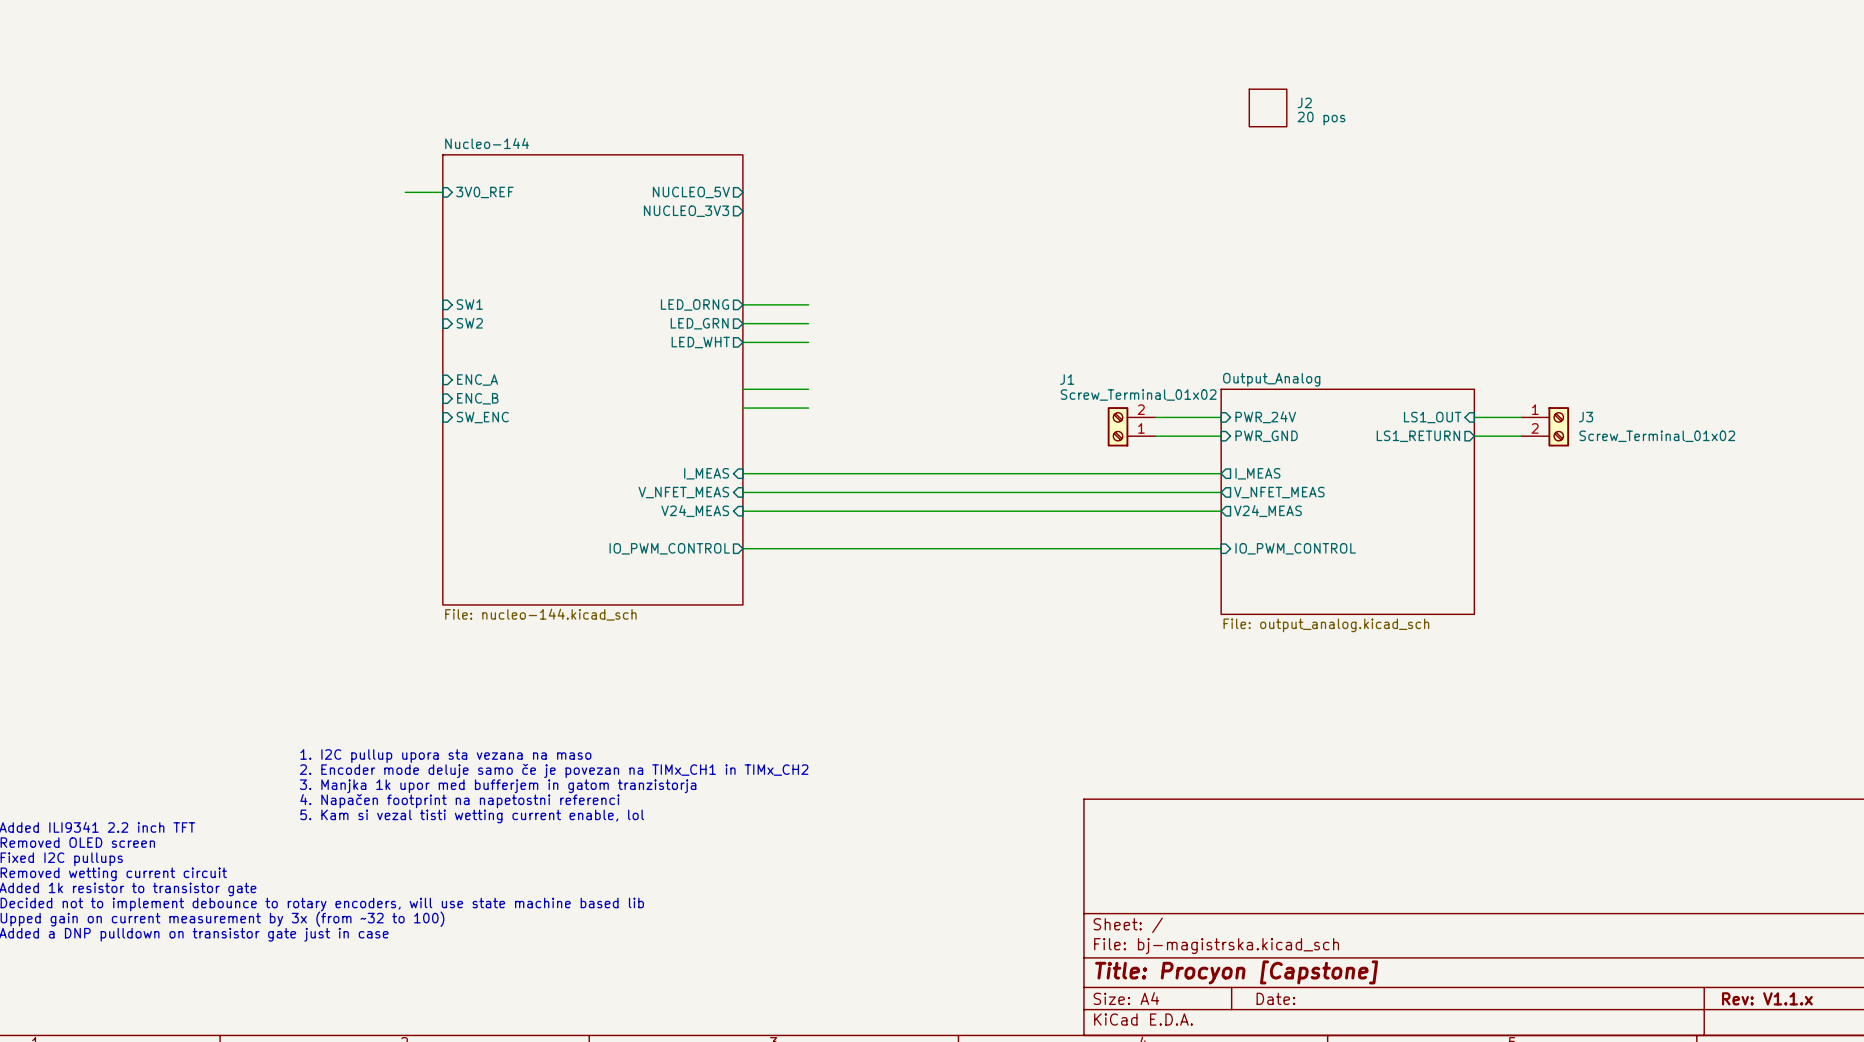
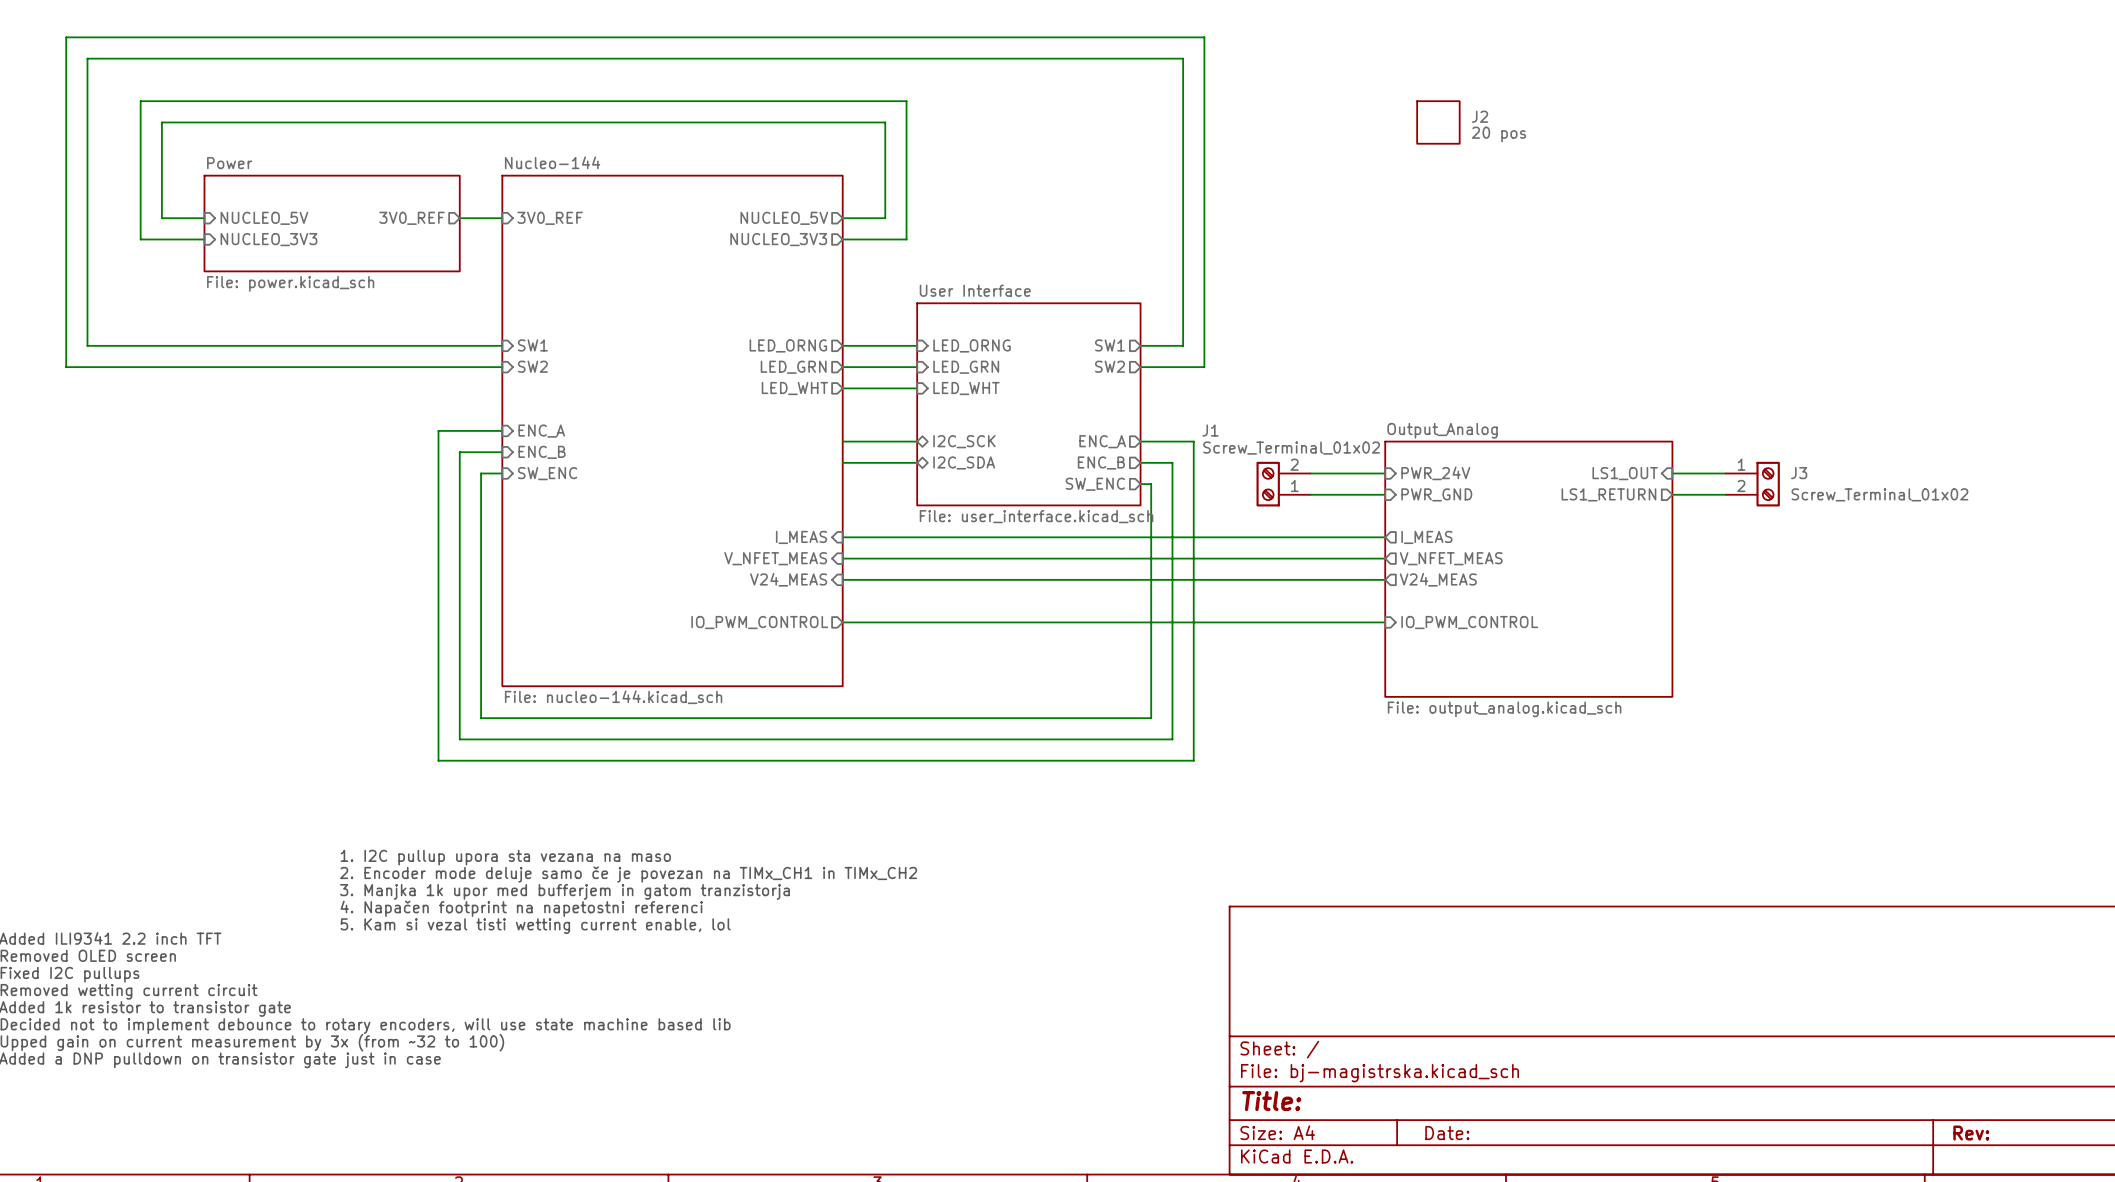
wire: none -> (204, 218) (161, 218) (161, 122) (885, 122) (885, 218) (842, 218)
sheet pin: none -> NUCLEO_5V (264, 218)
sheet pin: none -> 3V0_REF (411, 218)
sheet Power: none -> File: power.kicad_sch (332, 223)
wire: none -> (204, 239) (140, 239) (140, 101) (906, 101) (906, 239) (842, 239)
sheet pin: none -> NUCLEO_3V3 (268, 239)
wire: none -> (502, 345) (87, 345) (87, 58) (1183, 58) (1183, 345) (1140, 345)
sheet pin: none -> LED_ORNG (972, 345)
sheet pin: none -> SW1 (1110, 345)
wire: none -> (502, 367) (66, 367) (66, 37) (1204, 37) (1204, 367) (1140, 367)
sheet pin: none -> LED_GRN (966, 367)
sheet pin: none -> SW2 (1110, 366)
sheet pin: none -> LED_WHT (966, 388)
sheet User Interface: none -> File: user_interface.kicad_sch (1028, 404)
wire: none -> (502, 430) (438, 430) (438, 760) (1193, 760) (1193, 441) (1140, 441)
sheet pin: none -> I2C_SCK (964, 441)
sheet pin: none -> ENC_A (1102, 441)
wire: none -> (502, 452) (459, 452) (459, 739) (1172, 739) (1172, 462) (1140, 462)
sheet pin: none -> I2C_SDA (964, 462)
sheet pin: none -> ENC_B (1101, 462)
wire: none -> (502, 473) (481, 473) (481, 718) (1151, 718) (1151, 484) (1140, 484)
sheet pin: none -> SW_ENC (1095, 484)
title block: Title: Procyon [Capstone] (1236, 972) -> Title: (1271, 1101)
title block: Rev: V1.1.x (1767, 998) -> Rev: (1971, 1133)

